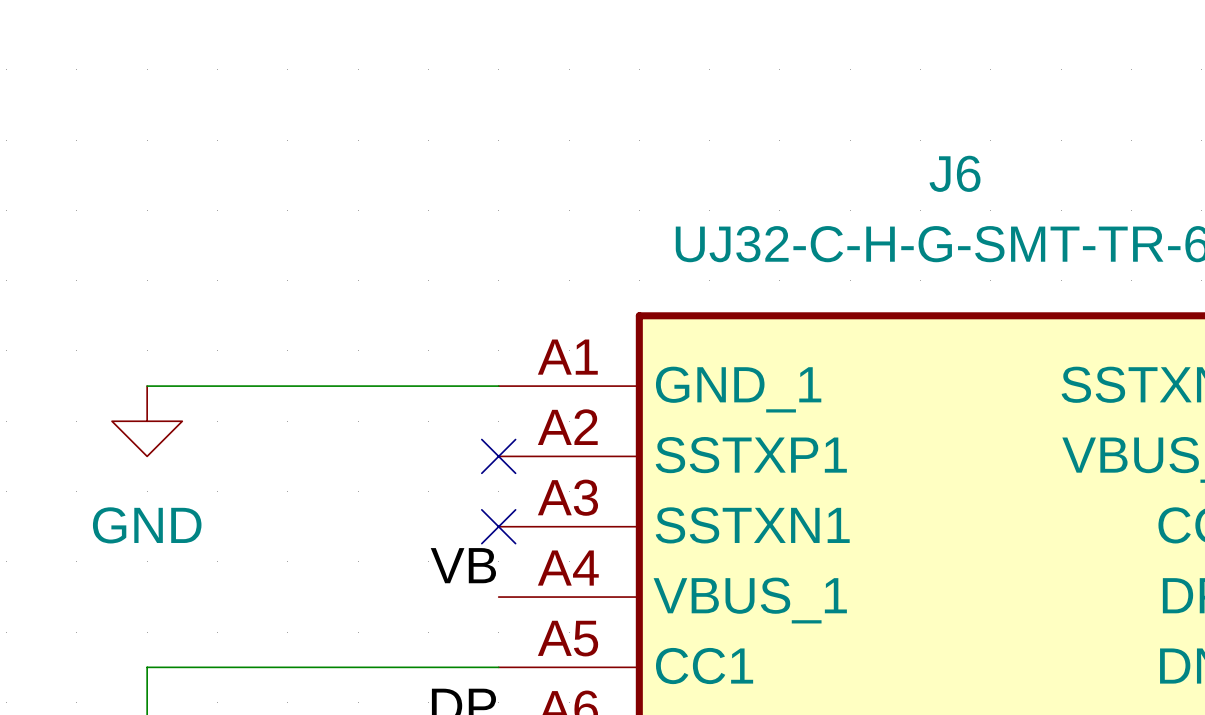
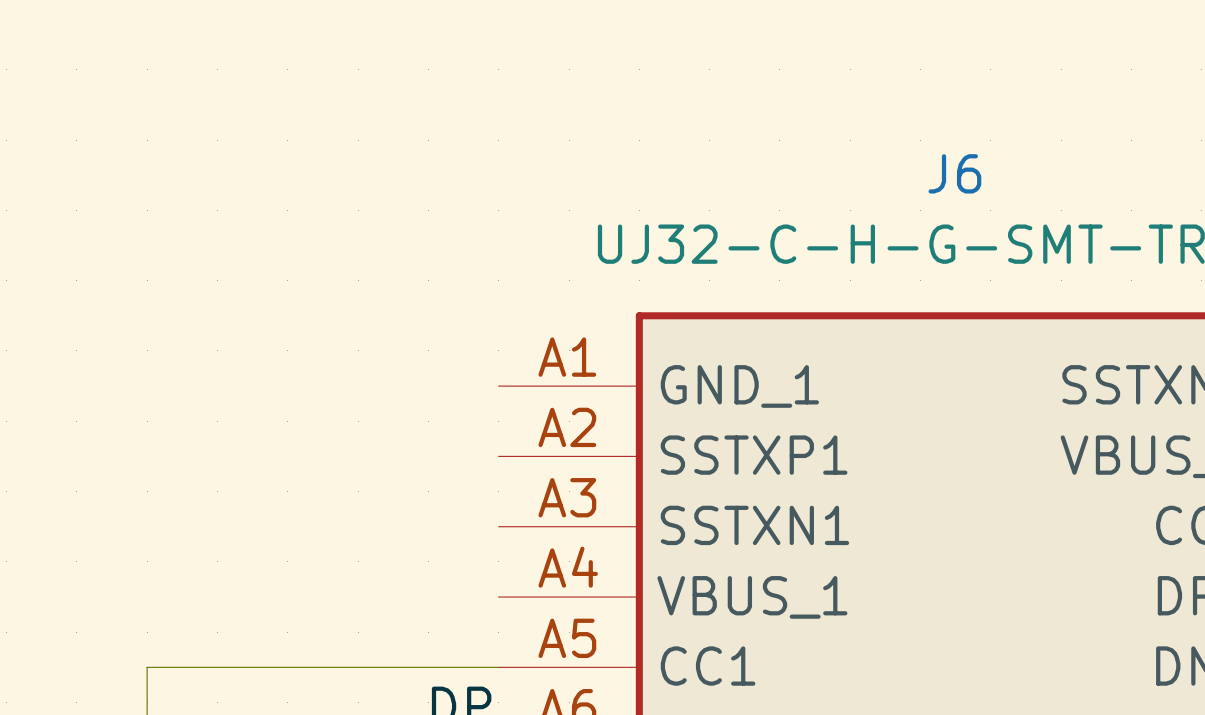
wire: (147, 386) (498, 386) -> none
power symbol: GND (147, 421) -> none
no-connect mark: (498, 456) -> none
no-connect mark: (498, 526) -> none
label: VB (463, 565) -> none

